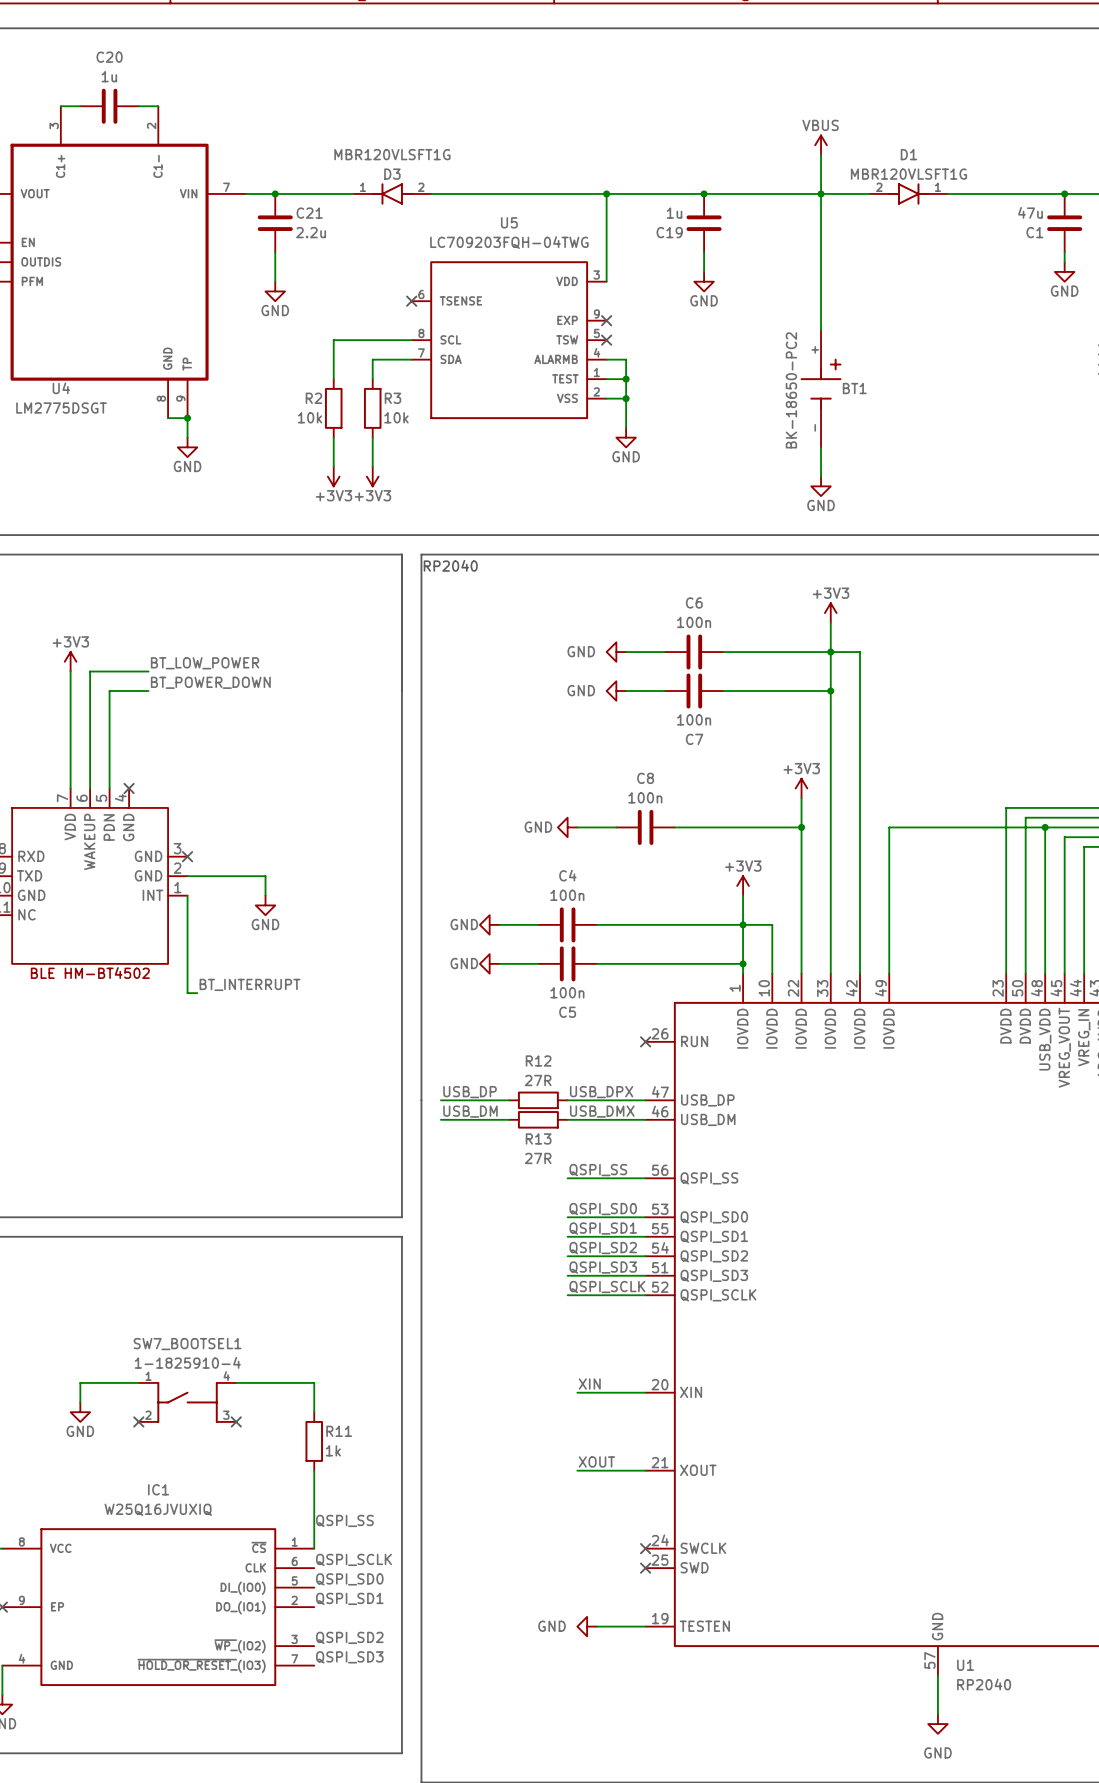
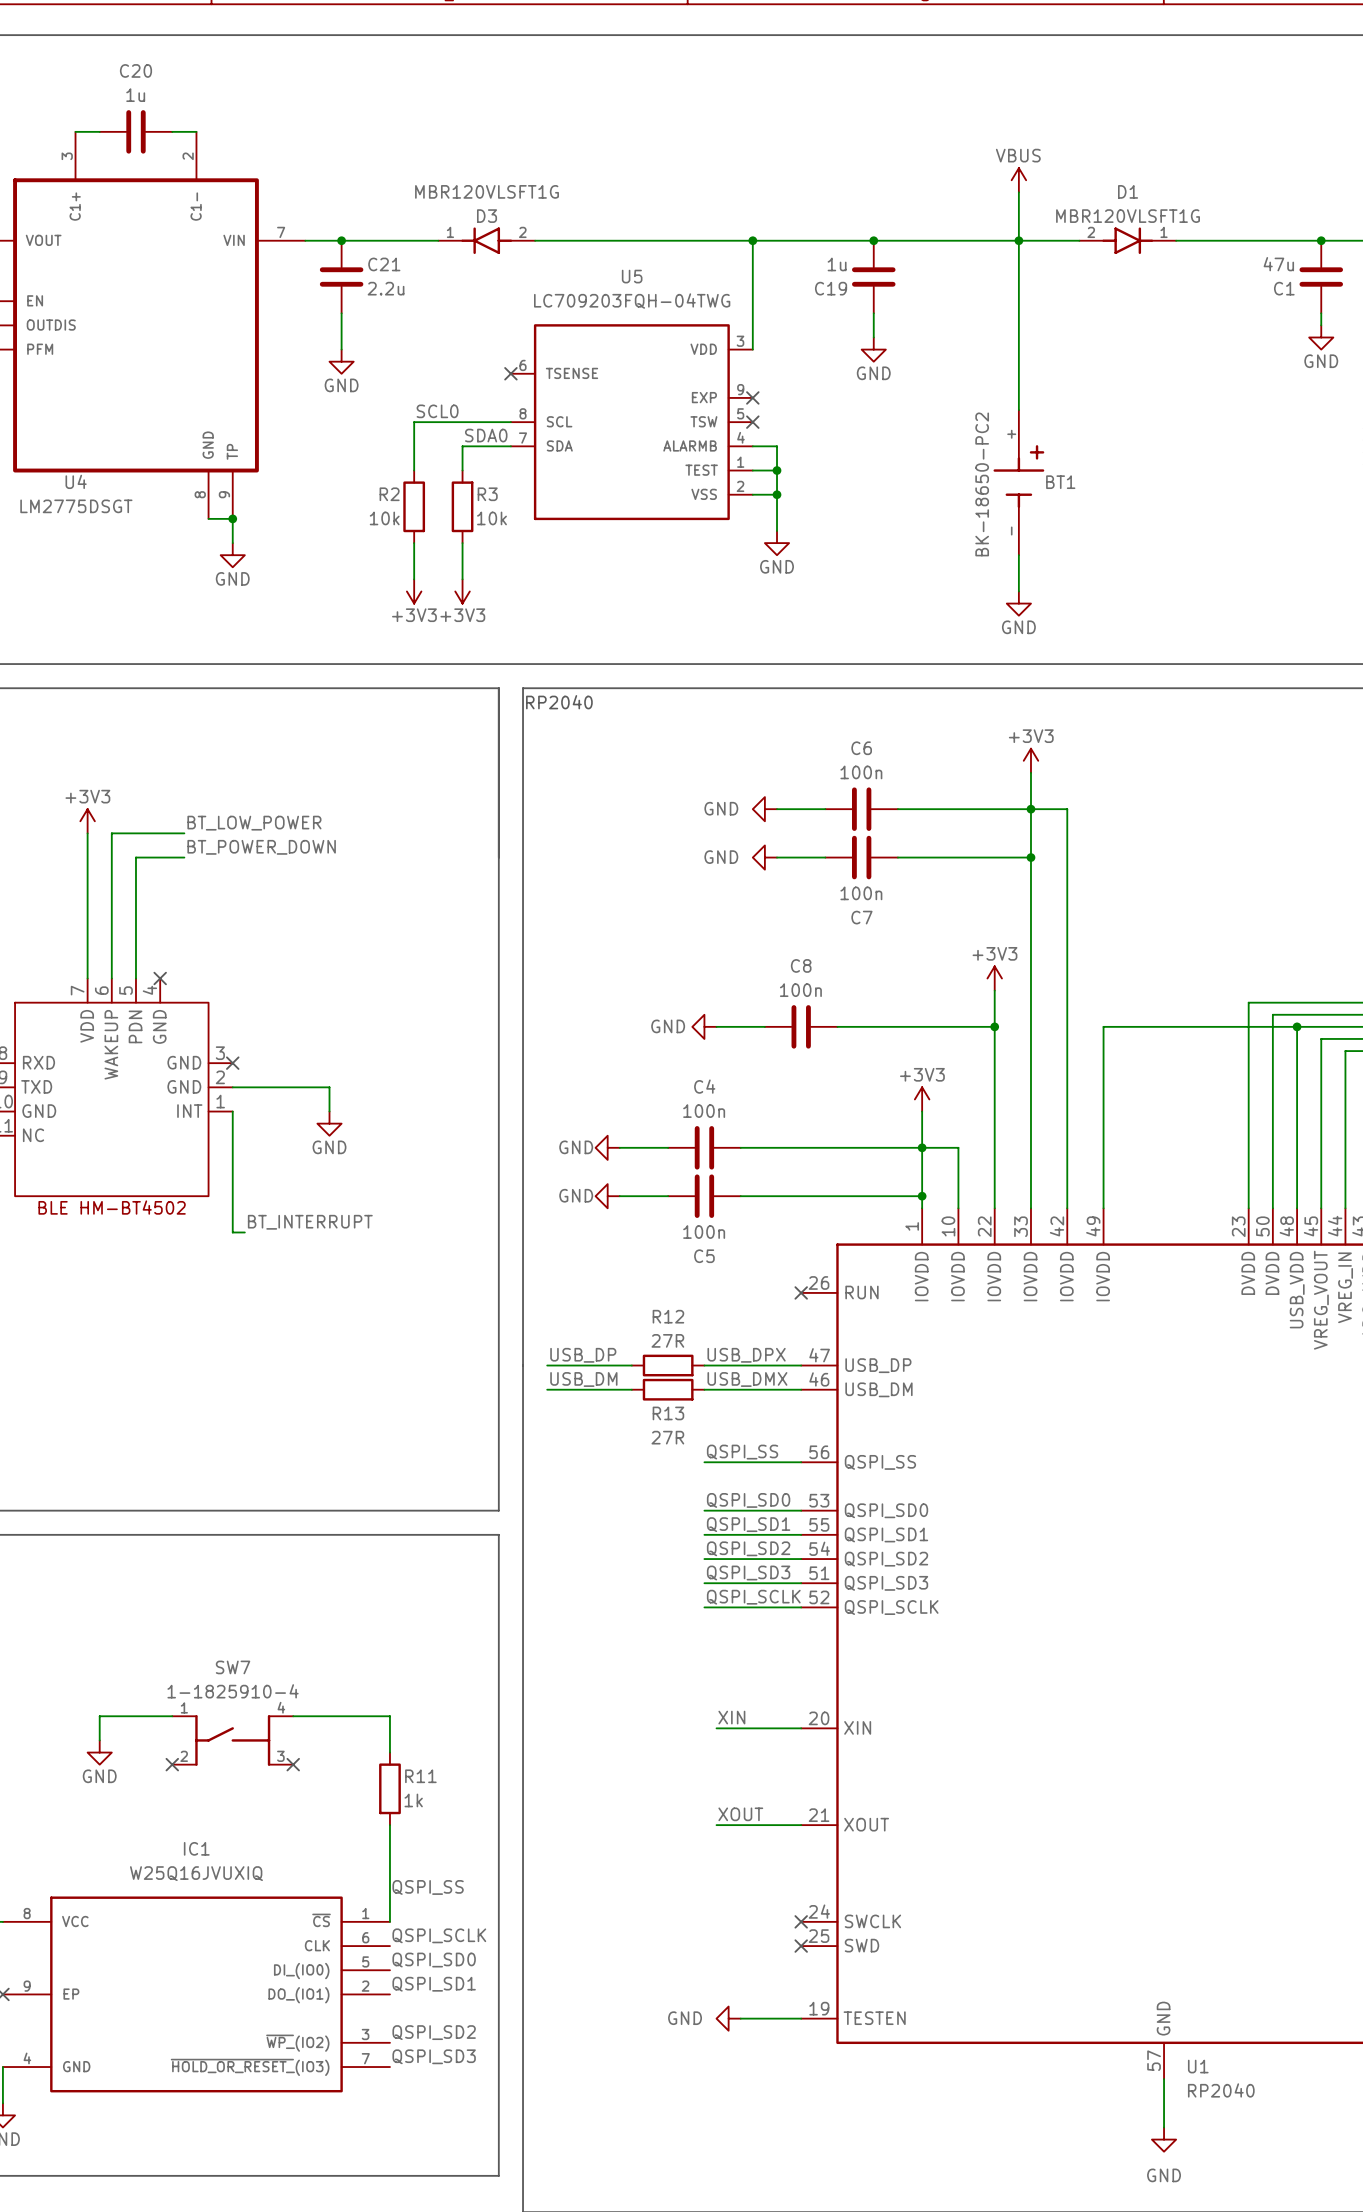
label: none -> SCL0 (437, 411)
label: none -> SDA0 (486, 435)
SW7_BOOTSEL1 name: SW7_BOOTSEL1 (187, 1344) -> SW7 (233, 1667)

